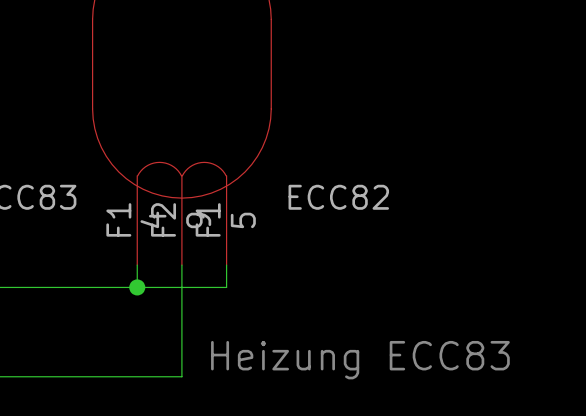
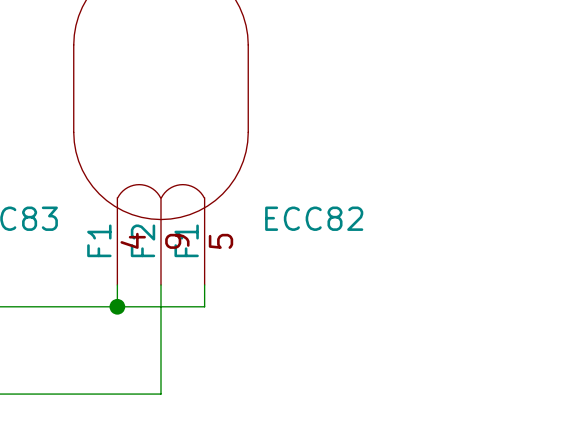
text: Heizung ECC83 (360, 360) -> none

